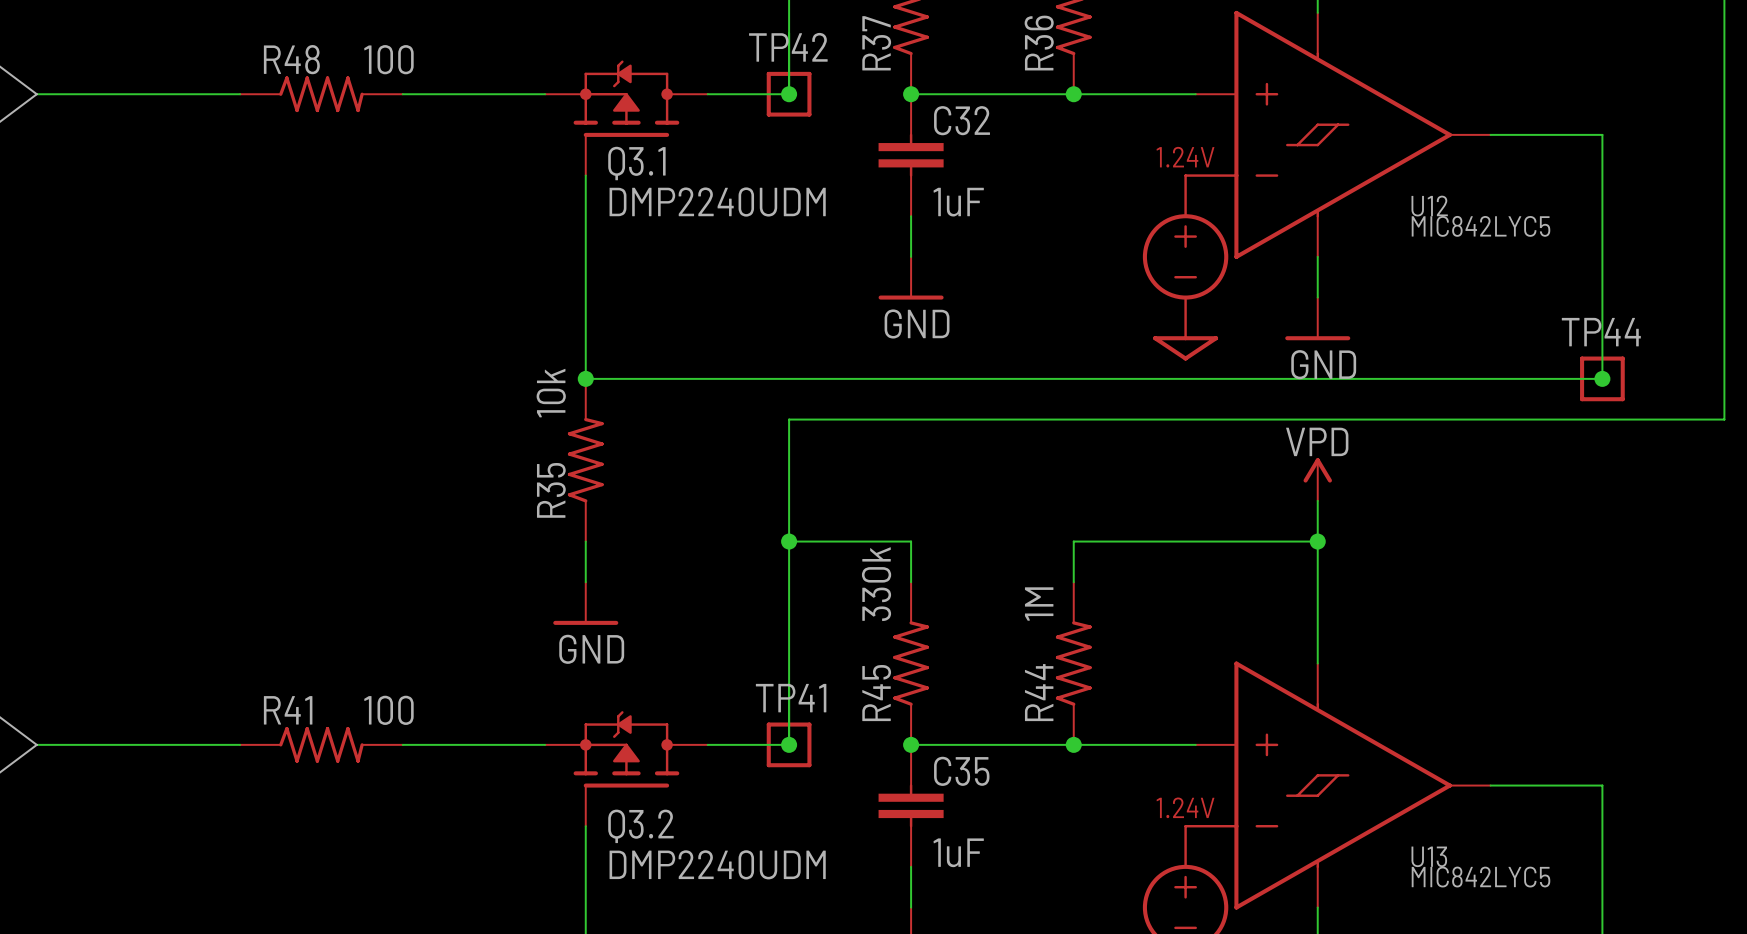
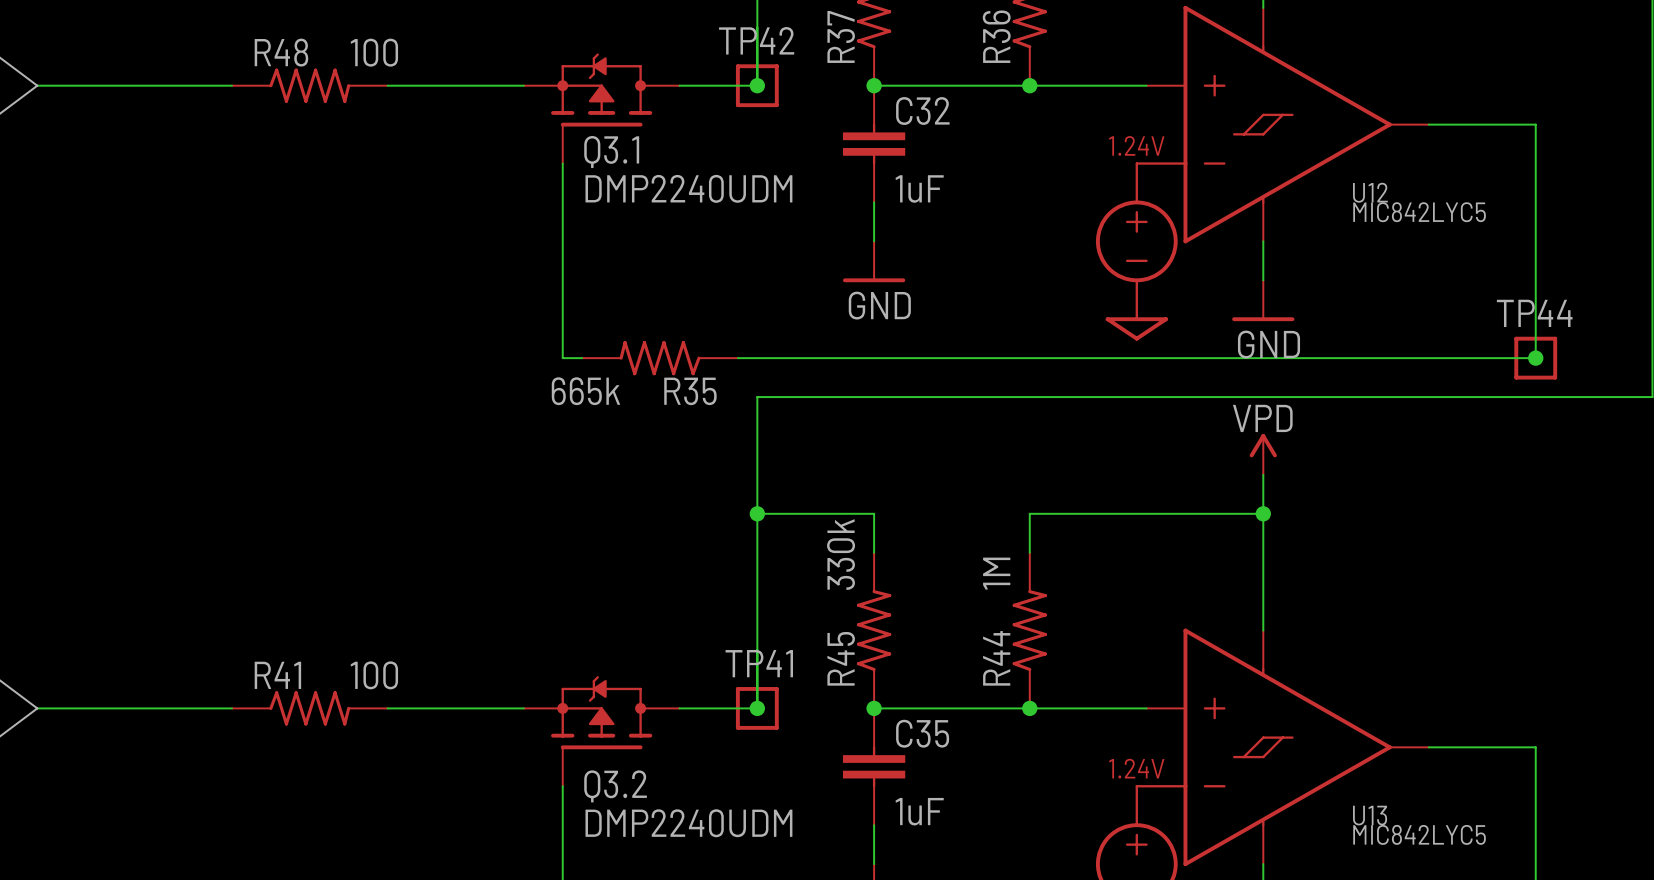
junction: (585, 378) -> none
R35 value: 10k (551, 393) -> 665k (585, 391)
R35 rotation: 0° (585, 460) -> 90° counterclockwise (660, 358)
R35 position: (585, 460) -> (660, 358)
wire: (585, 541) (585, 582) -> none
power symbol: GND (585, 603) -> none

